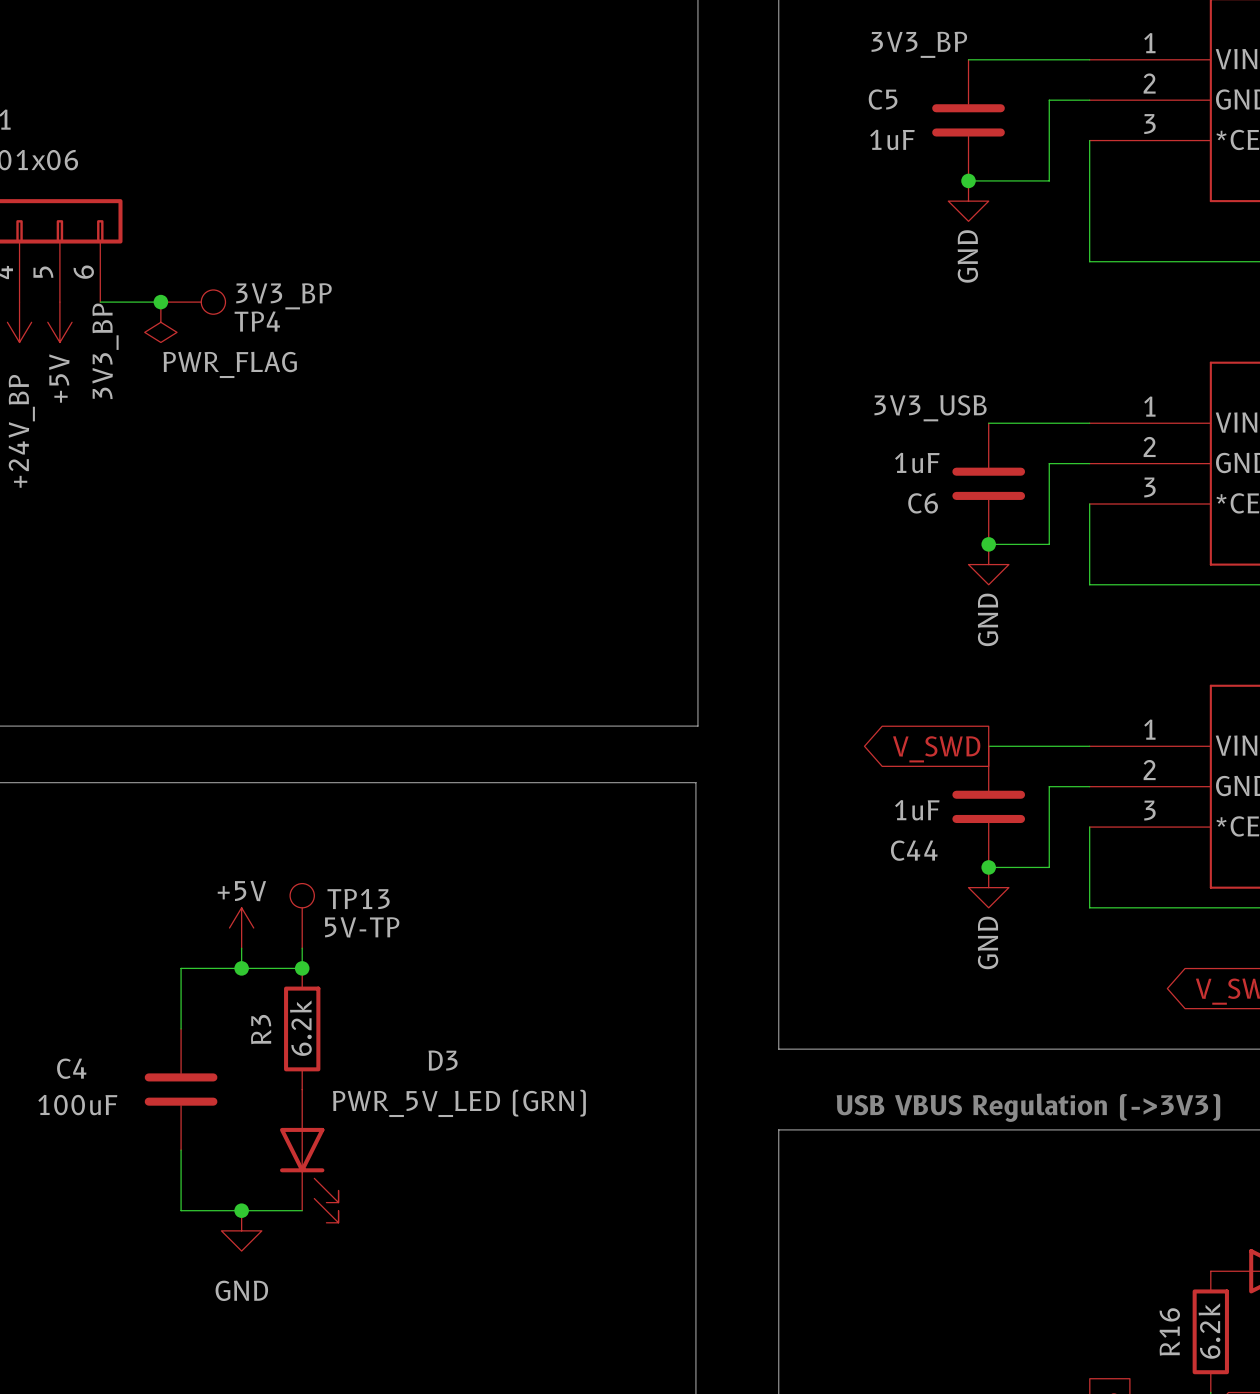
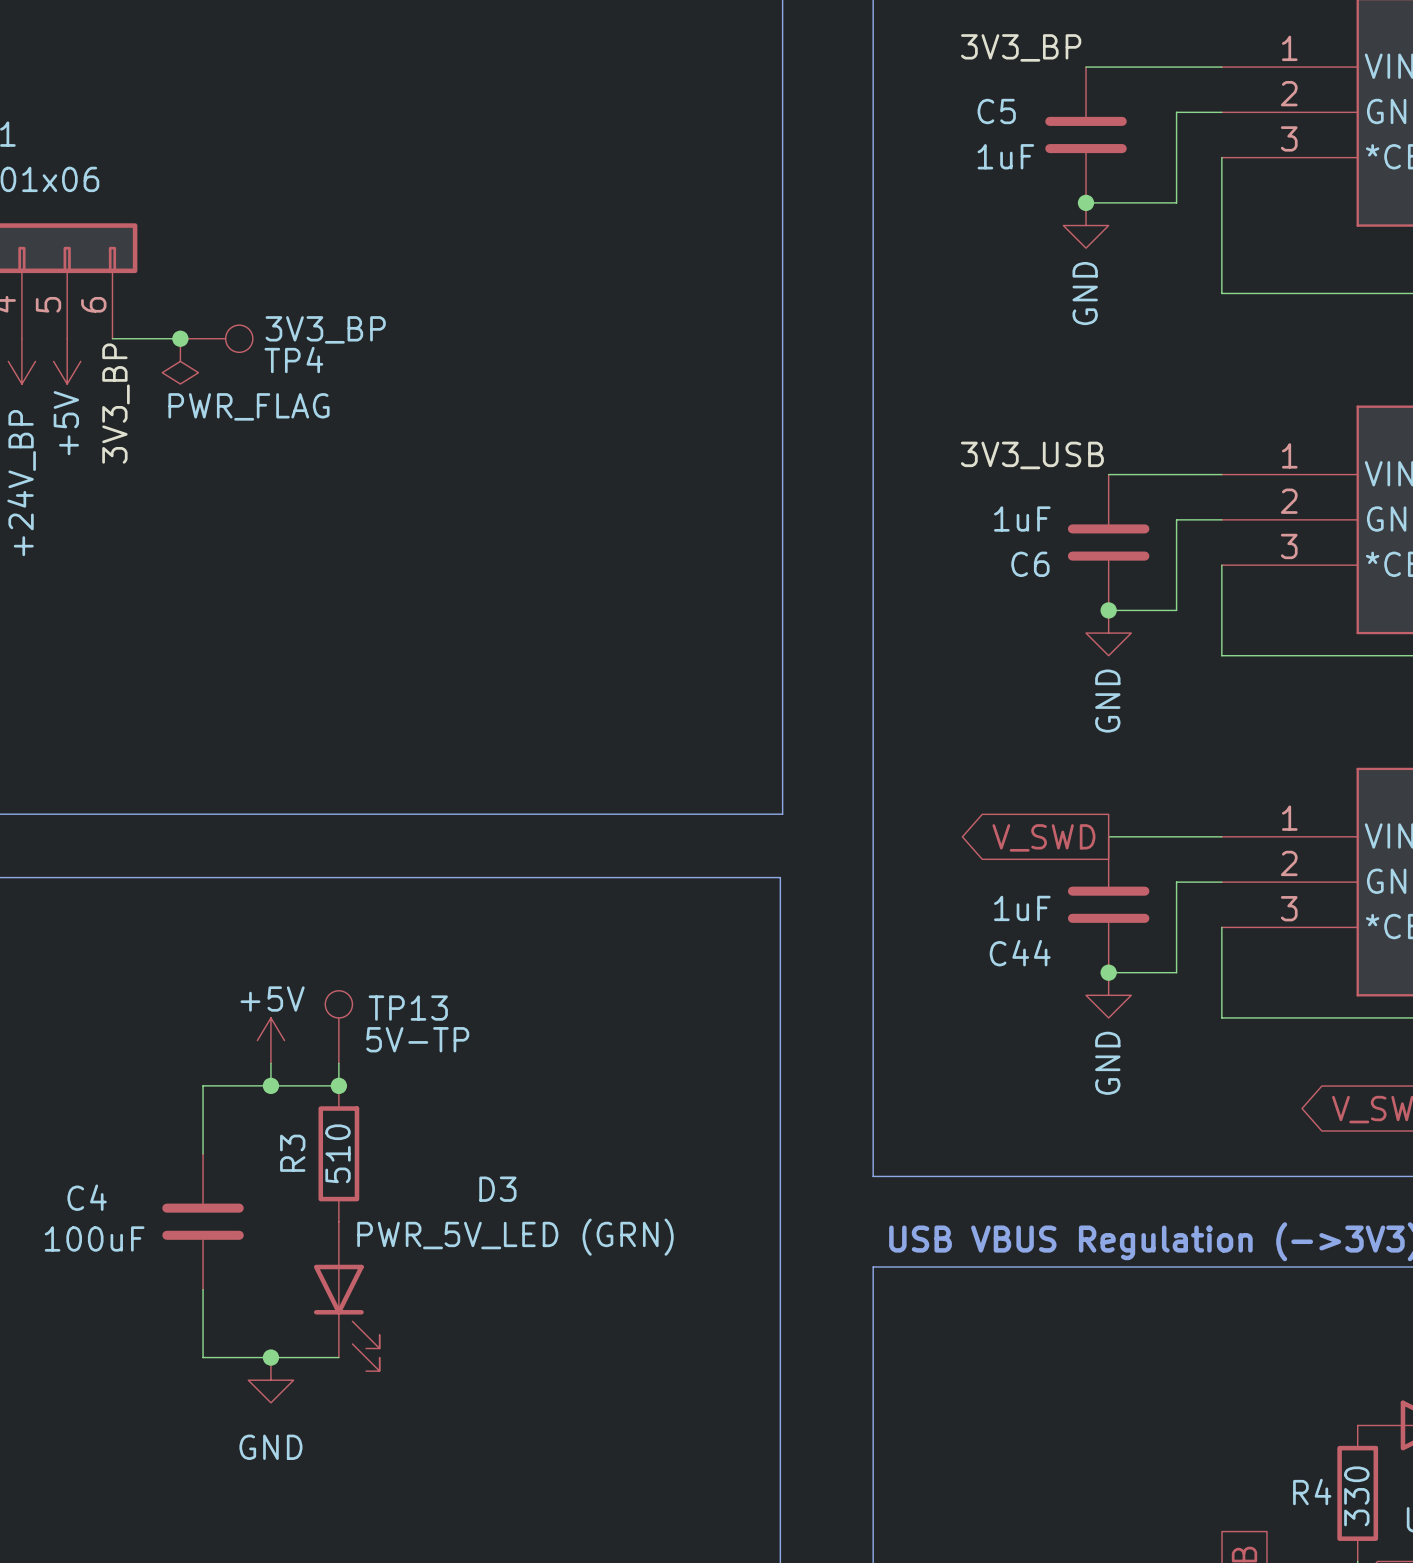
R3 value: 6.2k (300, 1028) -> 510 (338, 1153)
R16 name: R16 (1169, 1331) -> R4 (1312, 1492)
R16 value: 6.2k (1209, 1331) -> 330 (1356, 1496)

